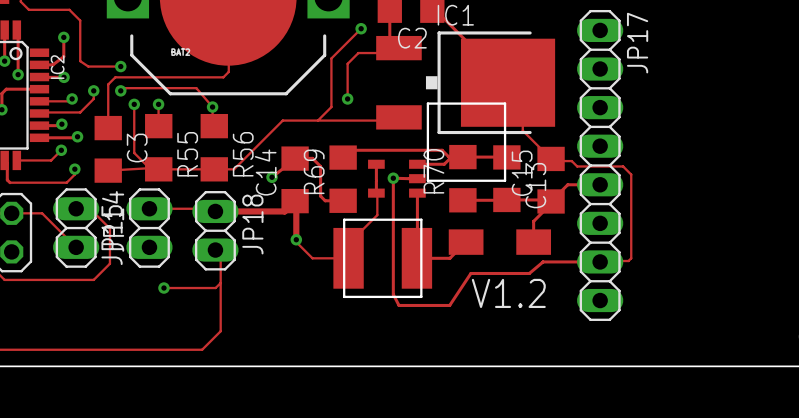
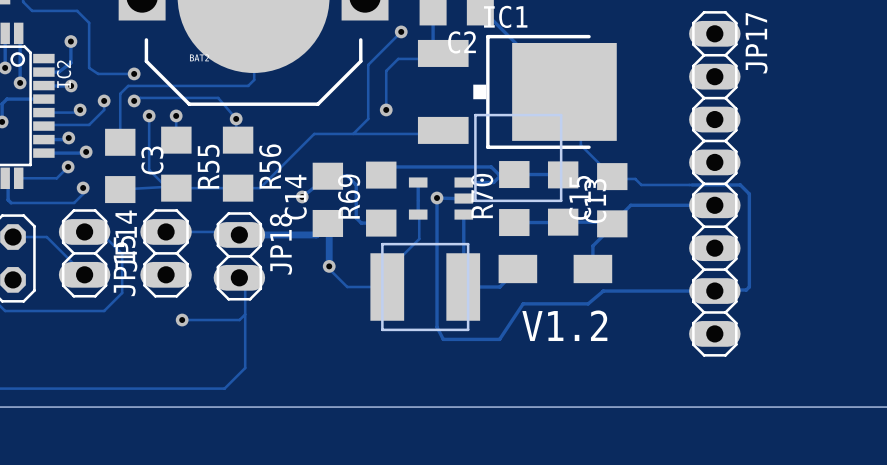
JP17 position: (600, 165) -> (714, 183)
track: (623, 166) (631, 174) (631, 258) (628, 261) (600, 261) -> (692, 184) (740, 184) (749, 193) (749, 287) (746, 290) (666, 291)
track: none -> (666, 205) (714, 205)

